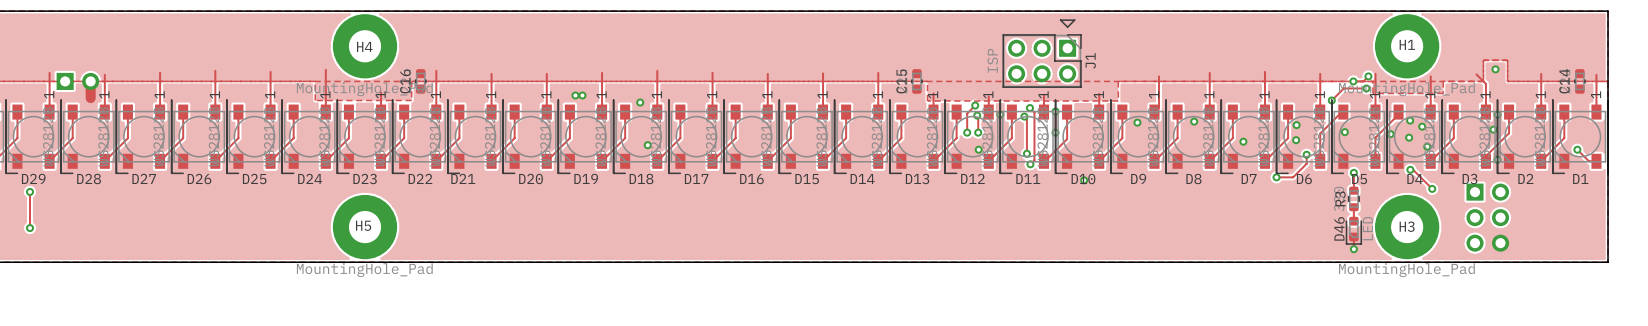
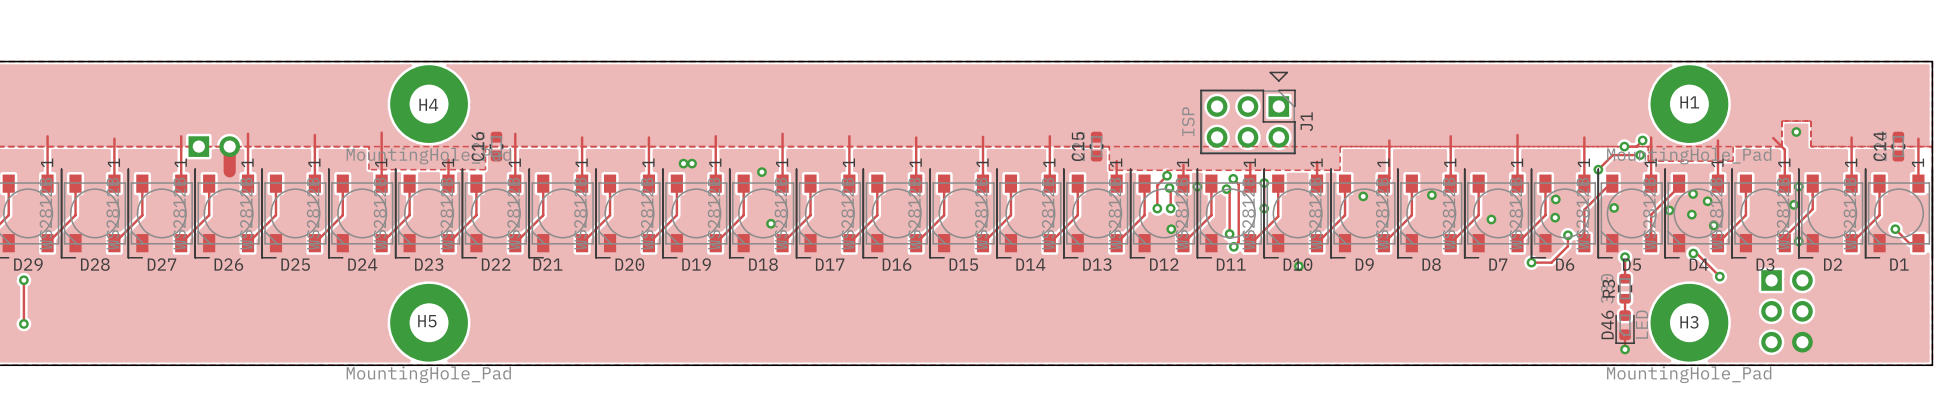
part position: (77, 81) -> (214, 146)
track: (90, 81) (90, 98) -> none
track: none -> (229, 146) (229, 171)

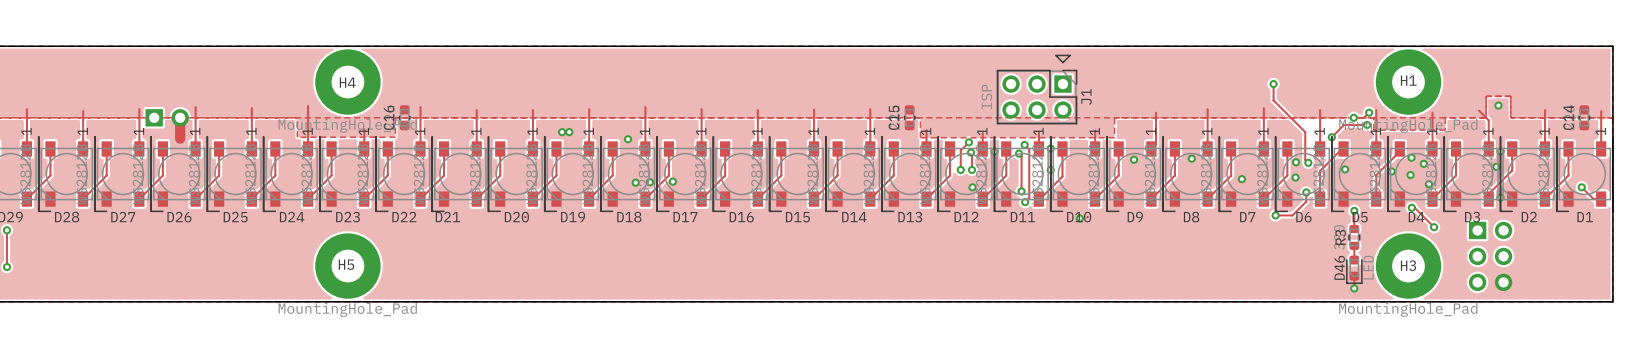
track: none -> (1273, 84) (1273, 100) (1305, 132) (1305, 159) (1308, 162)
via: none -> (1273, 84)
via: none -> (1308, 162)
via: none -> (672, 181)
via: none -> (650, 182)

